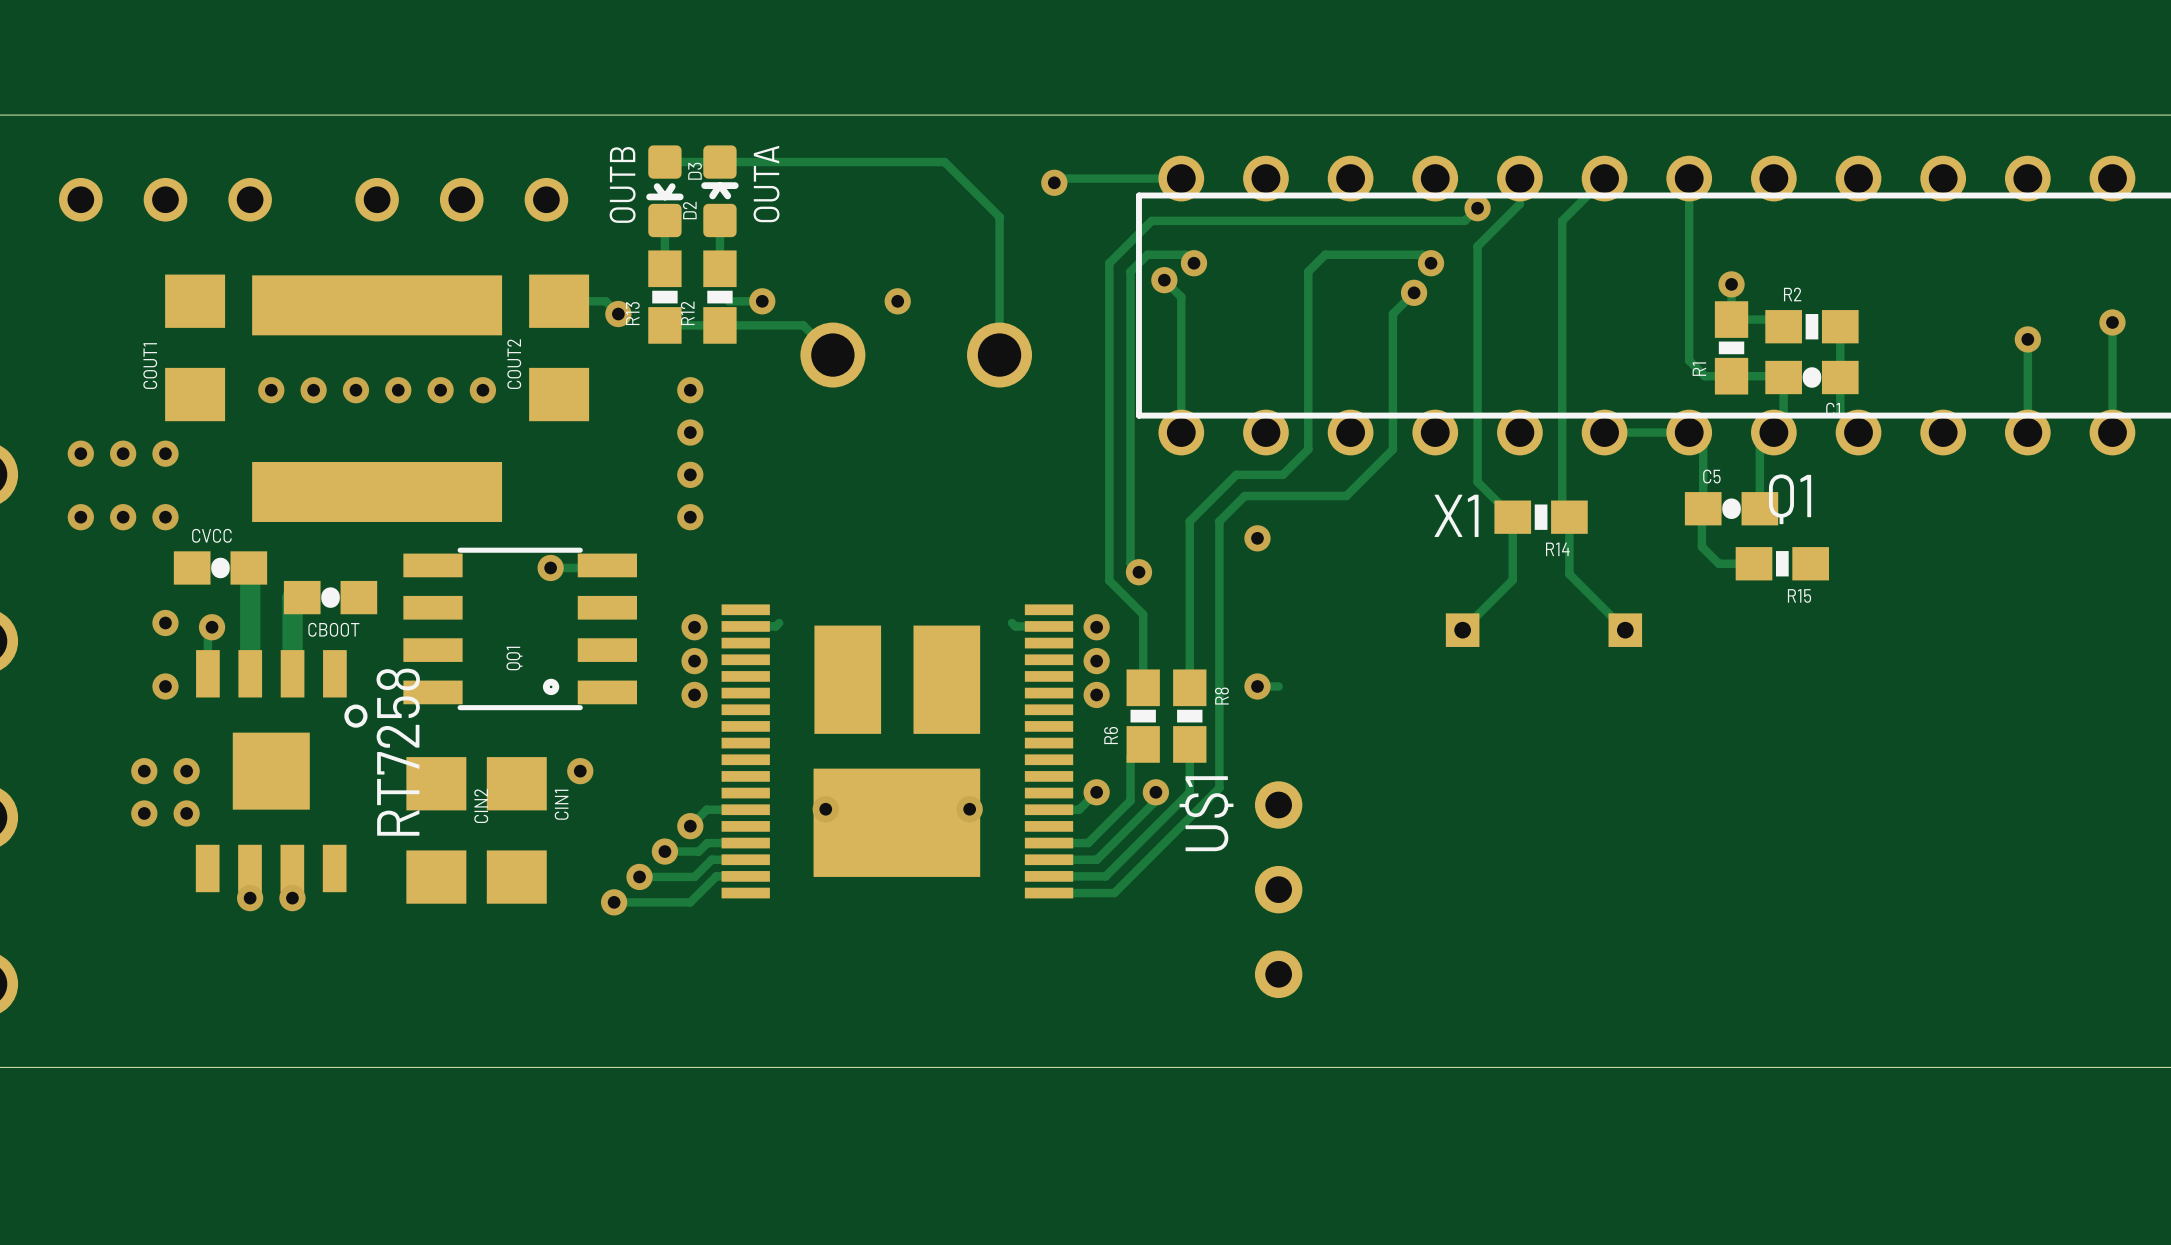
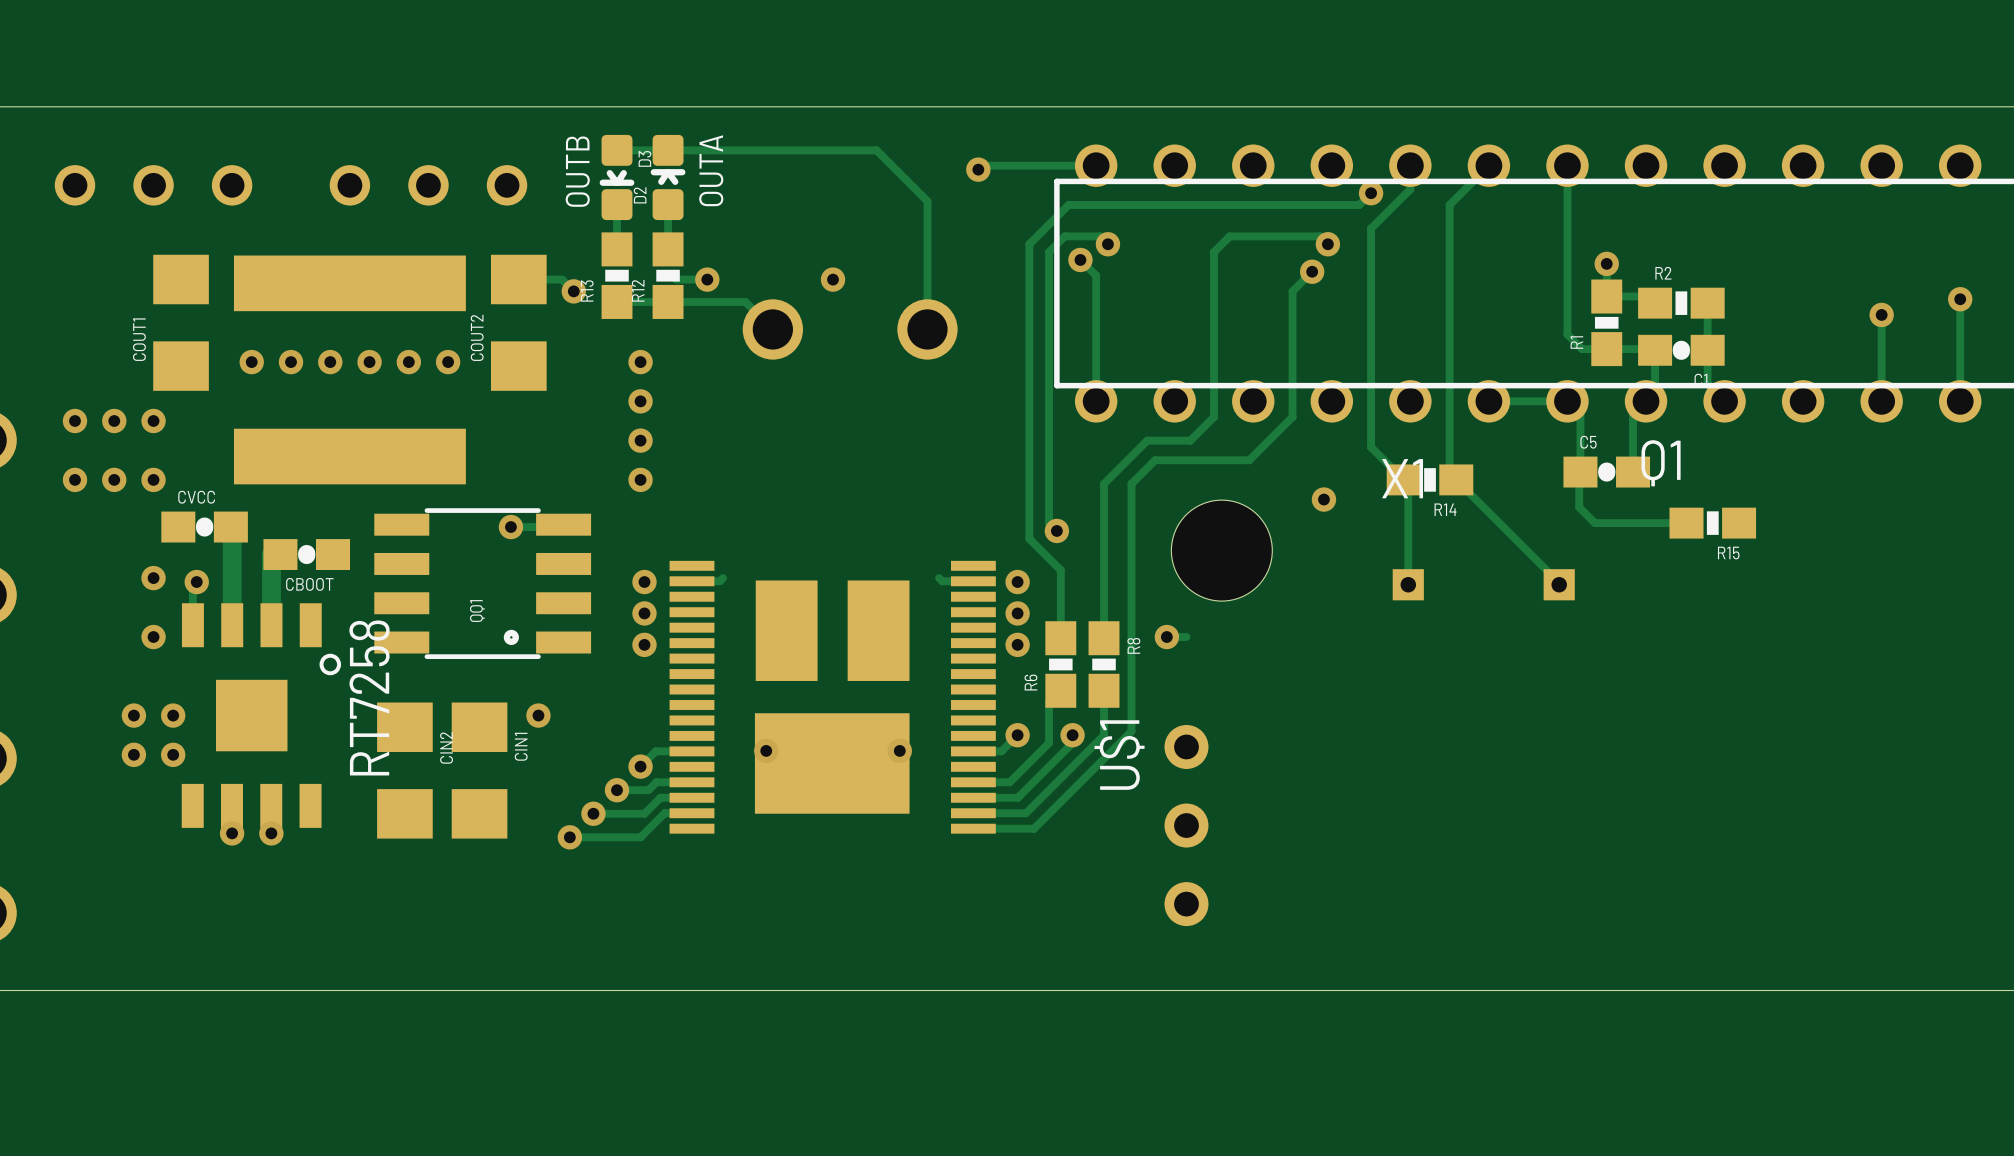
track: (1512, 517) (1512, 580) (1462, 630) -> (1403, 479) (1408, 484) (1408, 584)
track: (1569, 517) (1569, 574) (1625, 630) -> (1456, 479) (1559, 584)
via position: (1257, 538) -> (1323, 499)
track: none -> (1627, 523) (1686, 523)
R15 position: (1782, 563) -> (1712, 523)
part: none -> (1221, 550)
X1 position: (1543, 630) -> (1483, 584)

